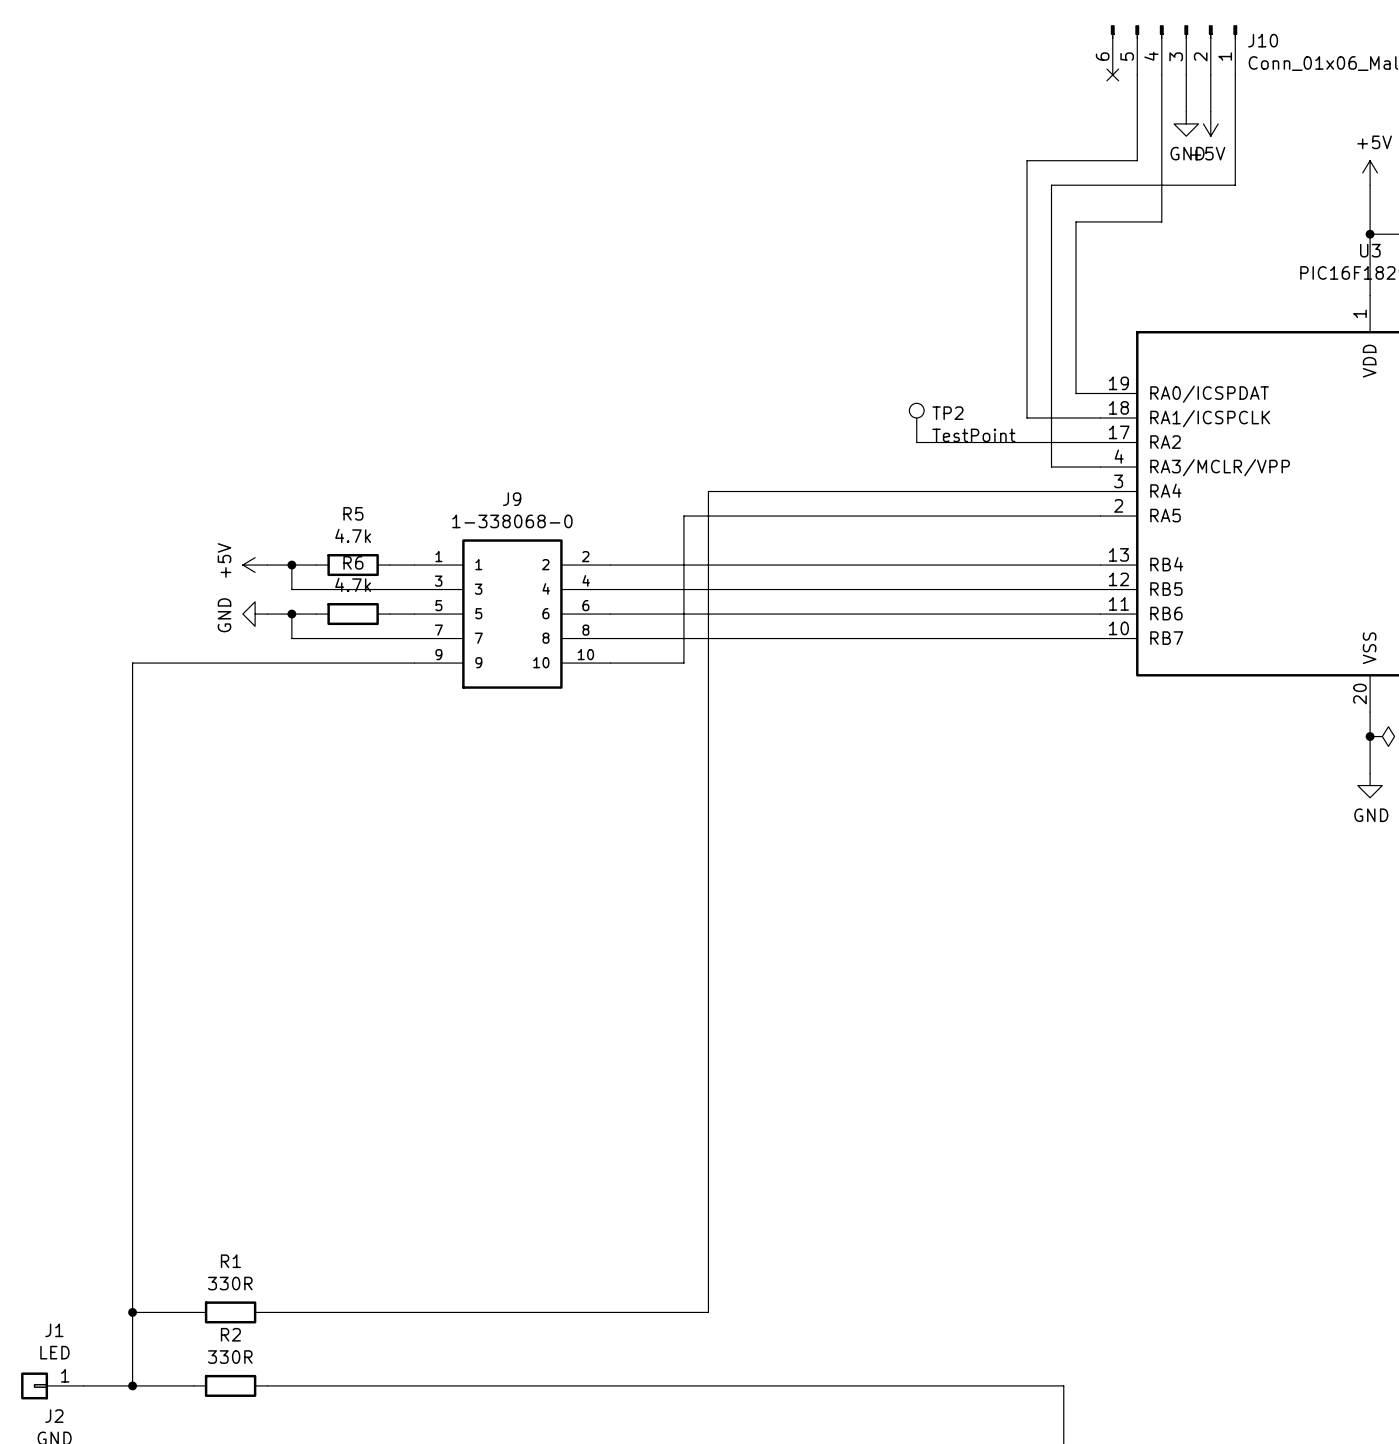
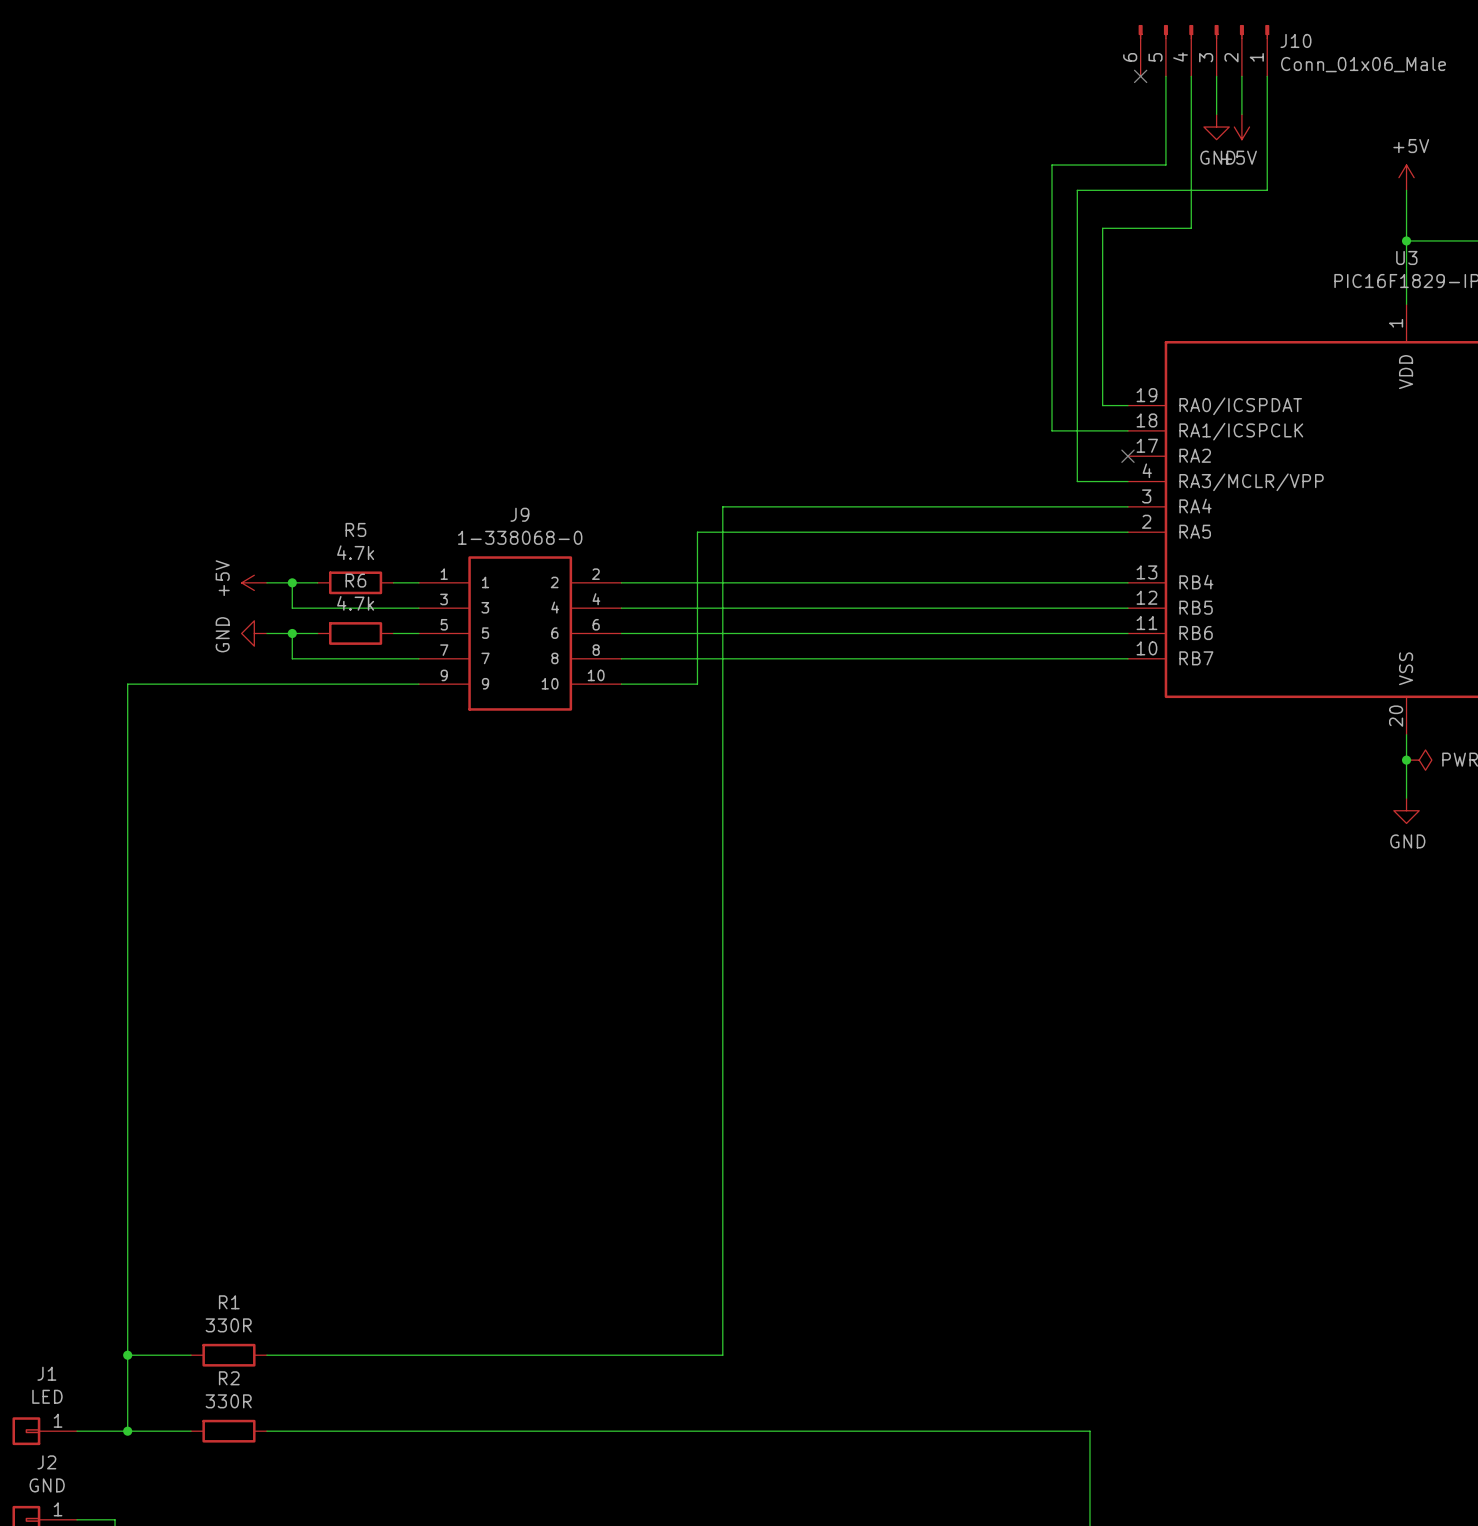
TP2: TestPoint (916, 422) -> none
wire: (916, 442) (1100, 442) -> none
no-connect mark: none -> (1127, 456)

